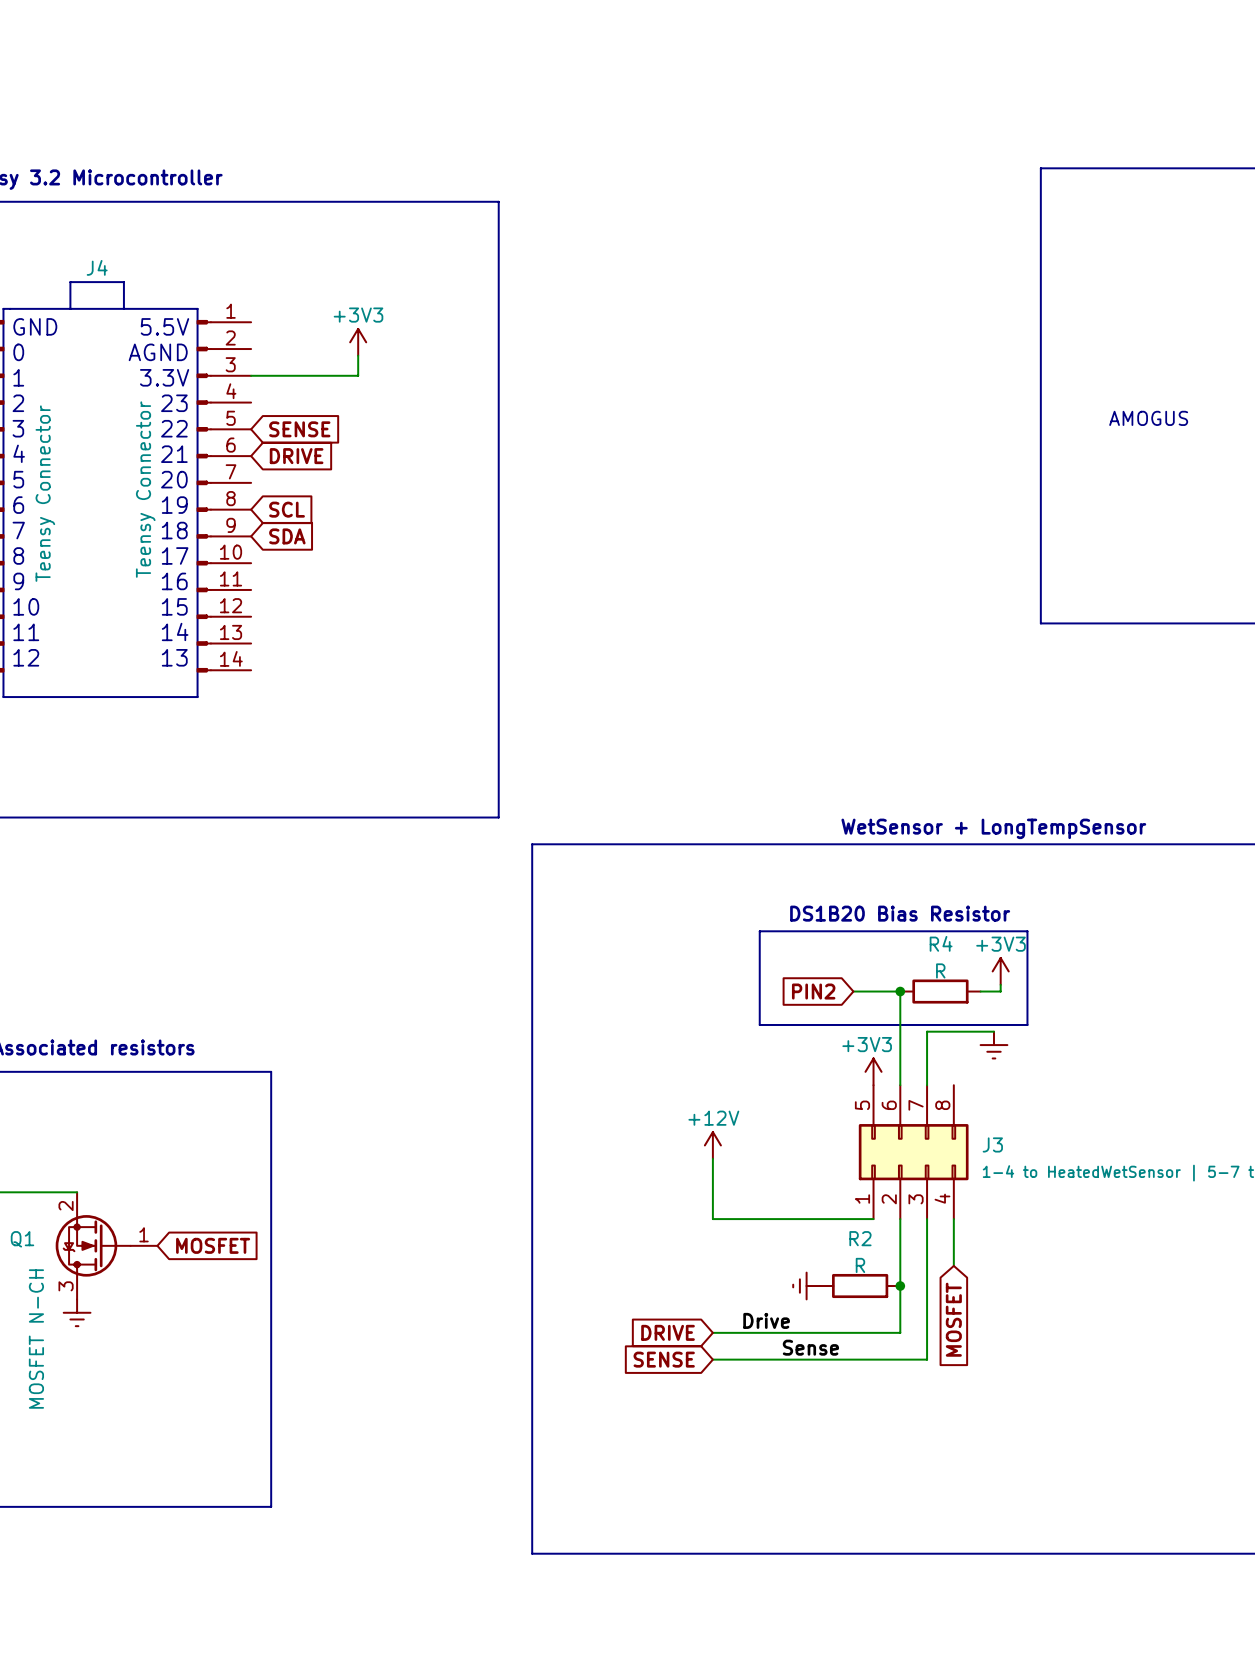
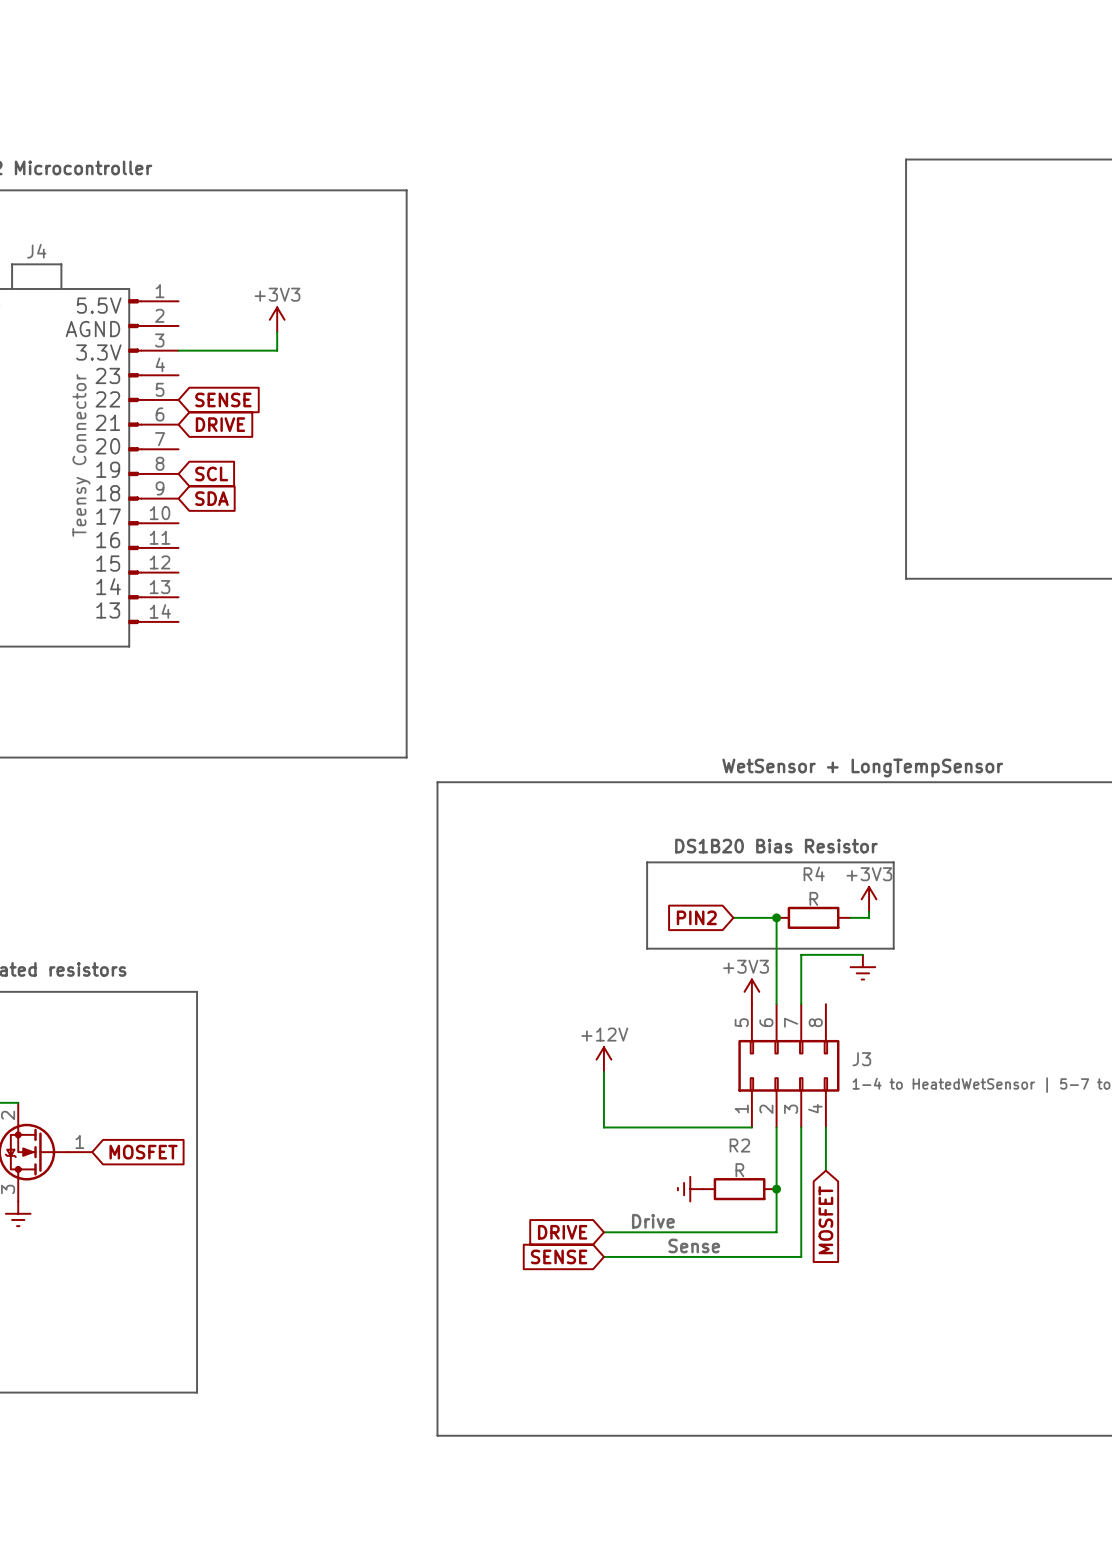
text: AMOGUS (1148, 418) -> none

